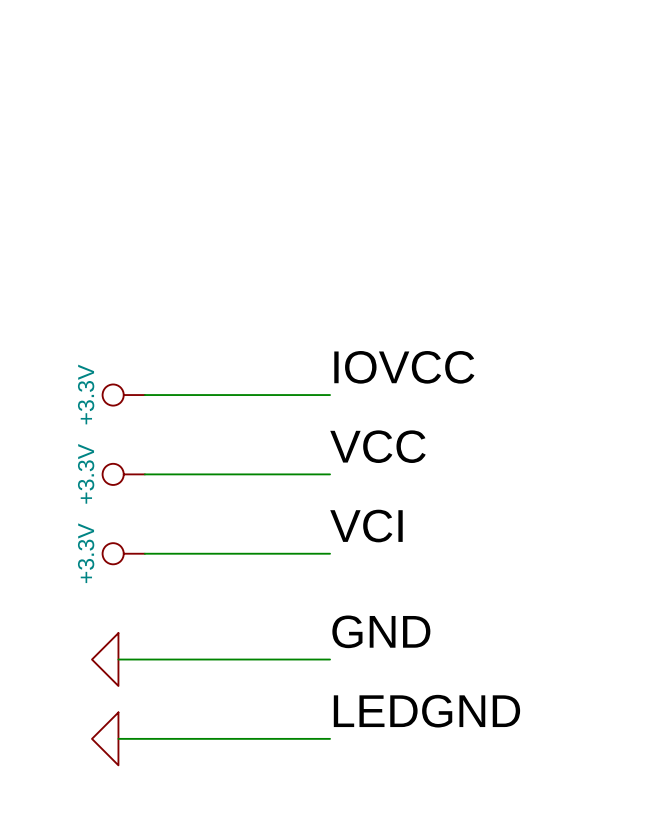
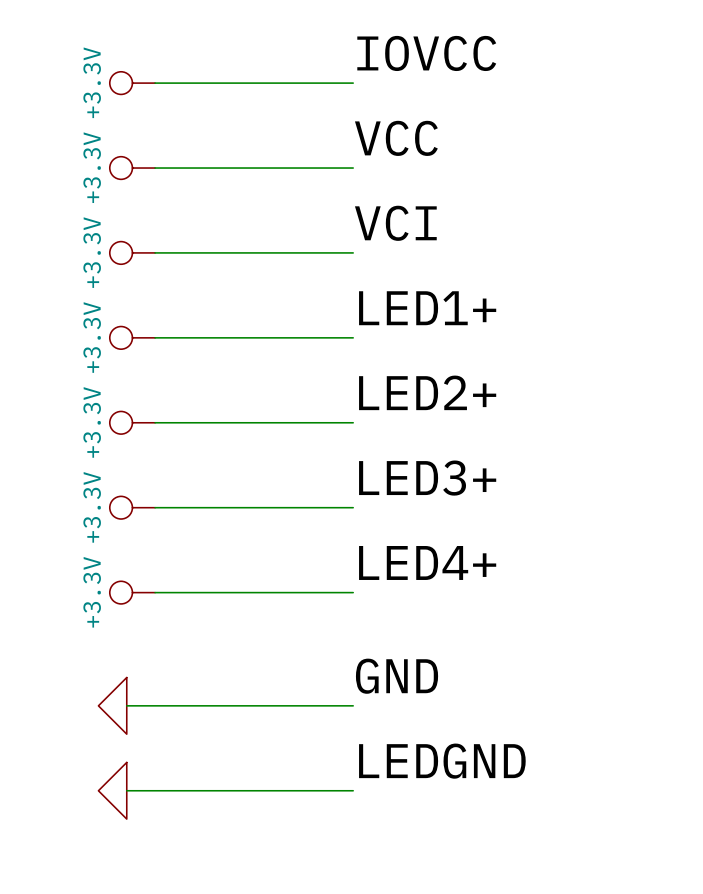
label: none -> IOVCC (426, 53)
power symbol: none -> +3.3V (132, 83)
wire: none -> (155, 83) (353, 83)
label: none -> VCC (396, 138)
power symbol: none -> +3.3V (132, 168)
wire: none -> (155, 168) (353, 168)
label: none -> VCI (395, 223)
power symbol: none -> +3.3V (132, 252)
wire: none -> (155, 252) (353, 252)
label: none -> LED1+ (427, 308)
power symbol: none -> +3.3V (132, 337)
wire: none -> (155, 337) (353, 337)
label: IOVCC (404, 367) -> LED2+ (427, 392)
label: VCC (377, 446) -> LED3+ (427, 478)
label: VCI (366, 526) -> LED4+ (427, 562)

